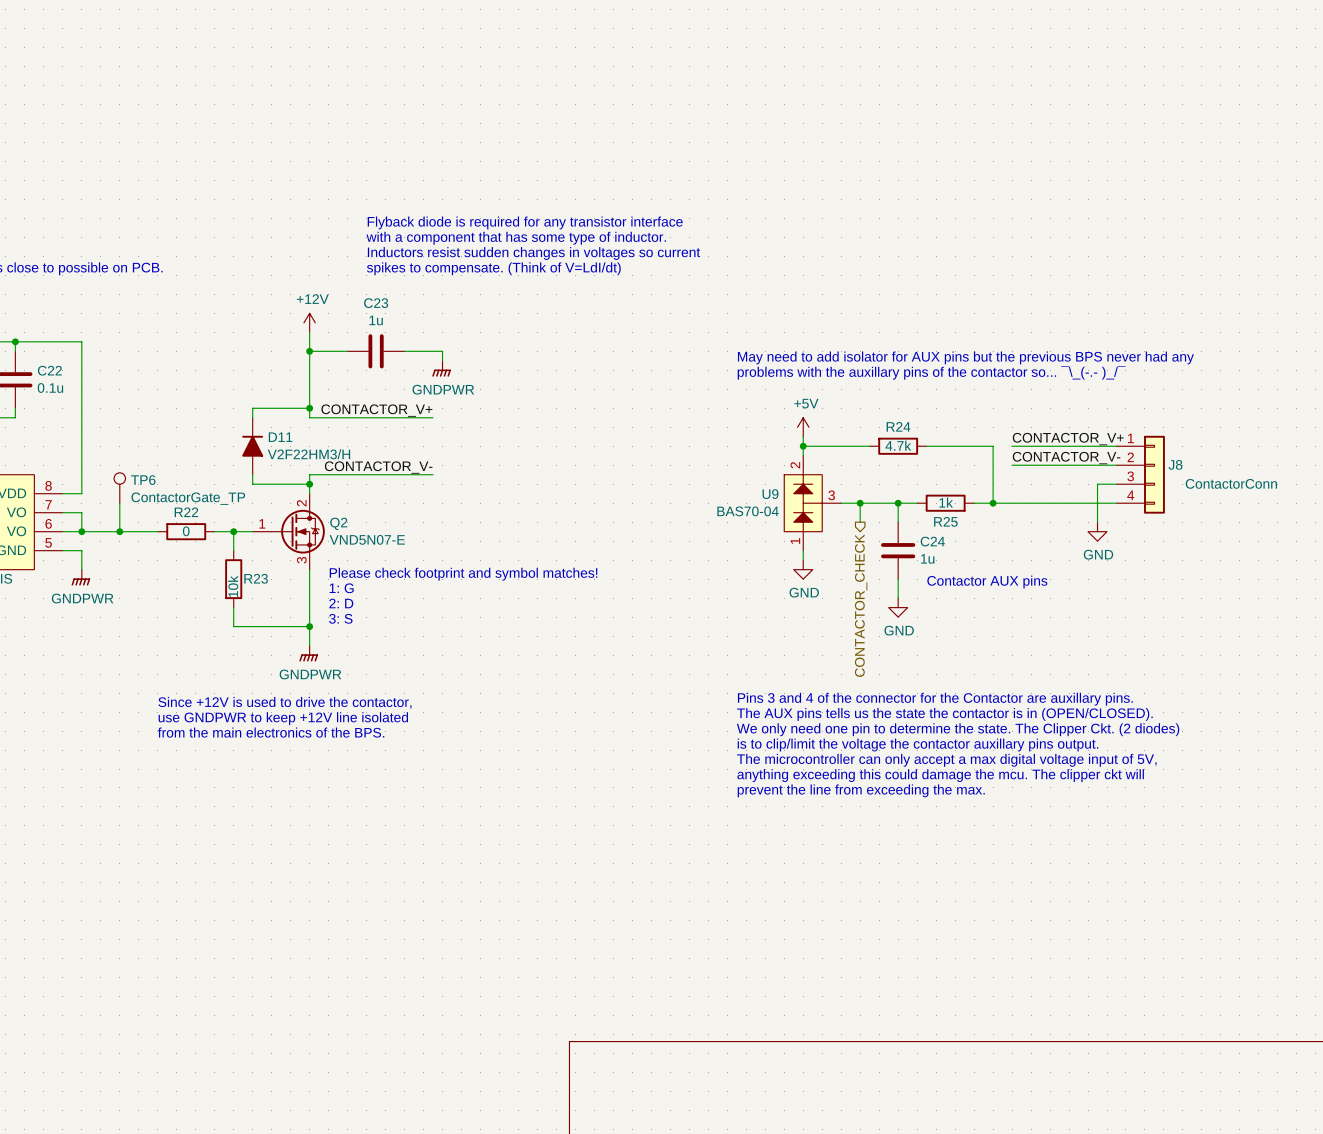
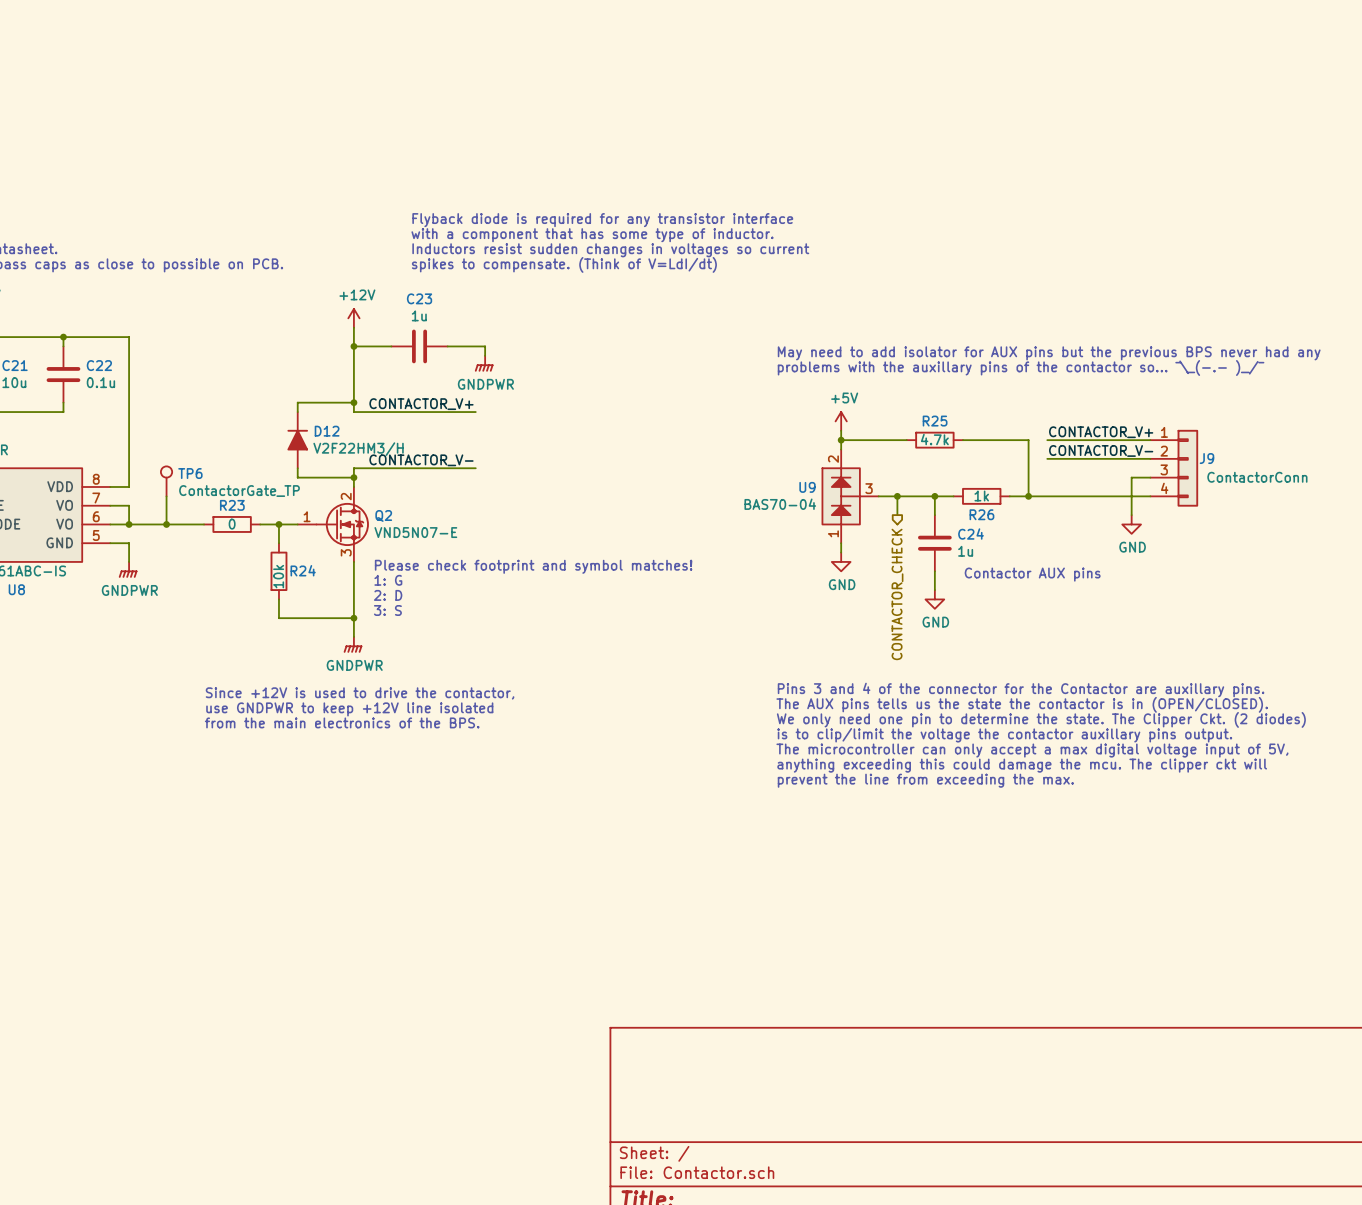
R24 name: R24 (898, 426) -> R25 (935, 421)
D11 name: D11 (280, 437) -> D12 (327, 431)
J8 name: J8 (1175, 464) -> J9 (1206, 458)
R22 name: R22 (186, 512) -> R23 (232, 505)
R25 name: R25 (945, 521) -> R26 (981, 514)
R23 name: R23 (256, 578) -> R24 (303, 570)

